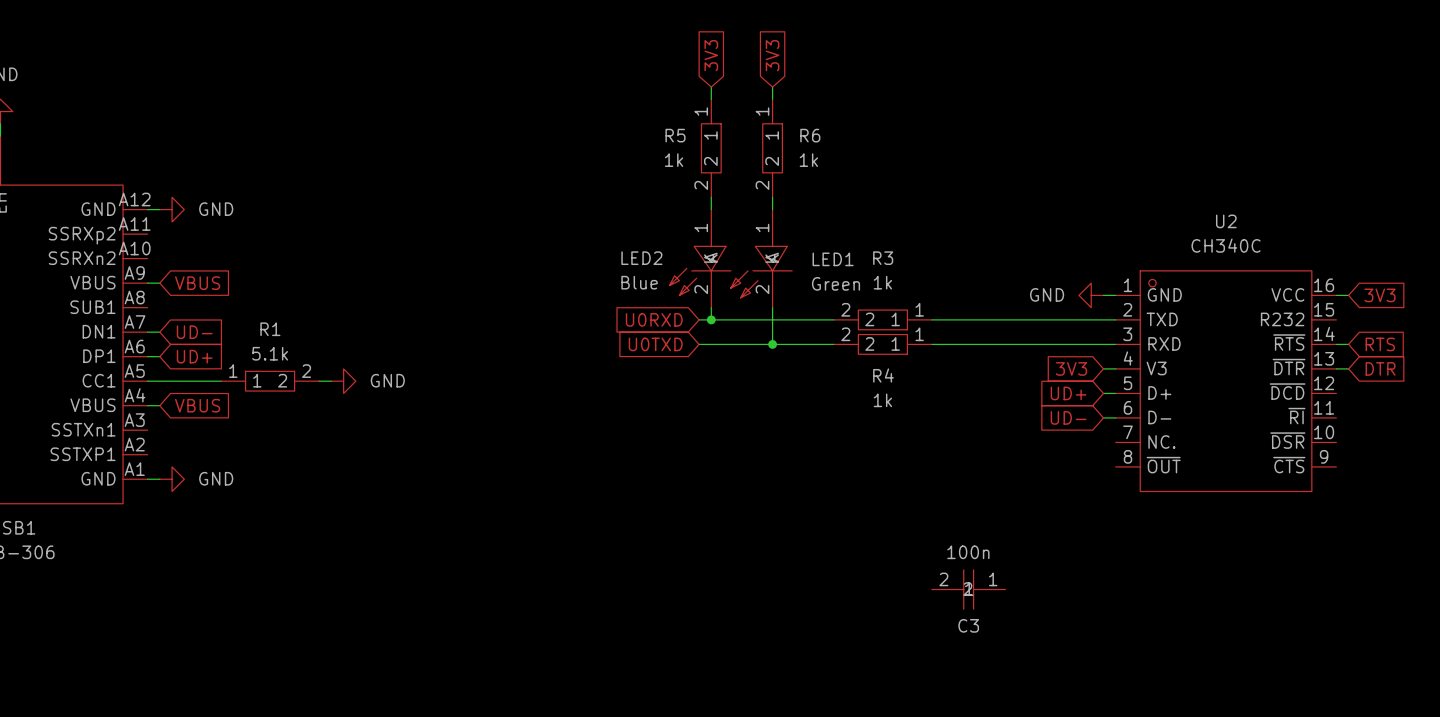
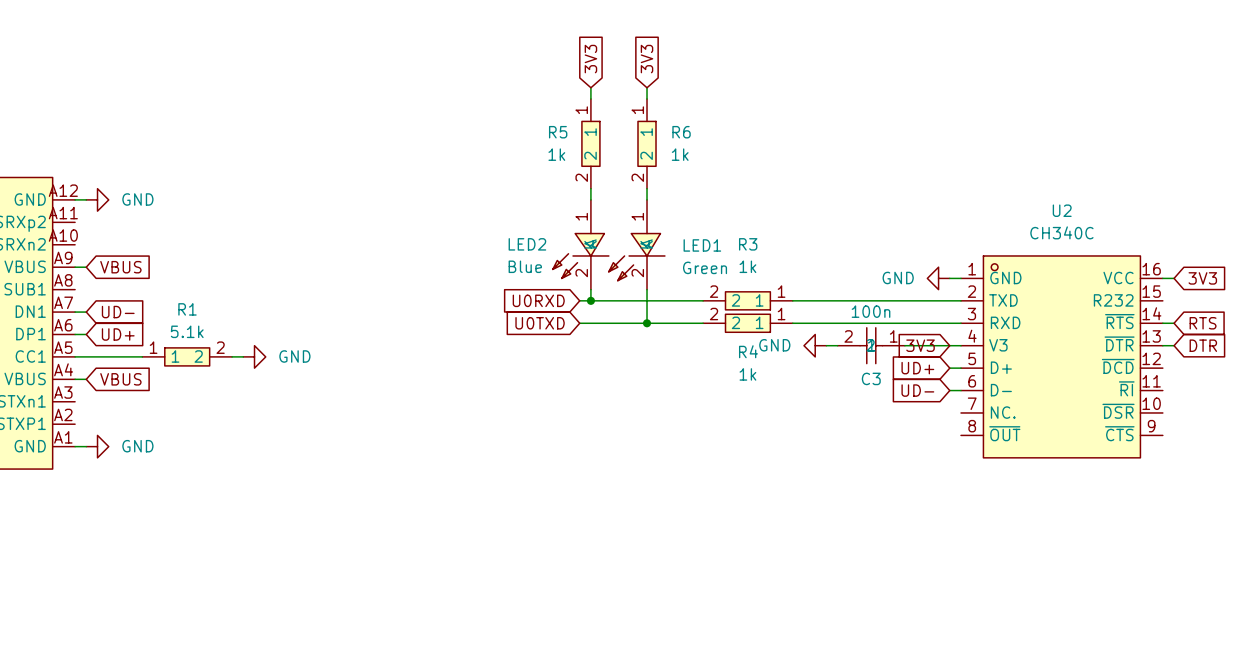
power symbol: none -> GND (815, 345)
wire: none -> (826, 345) (837, 345)
wire: none -> (904, 345) (949, 345)
C3 position: (968, 589) -> (871, 345)

